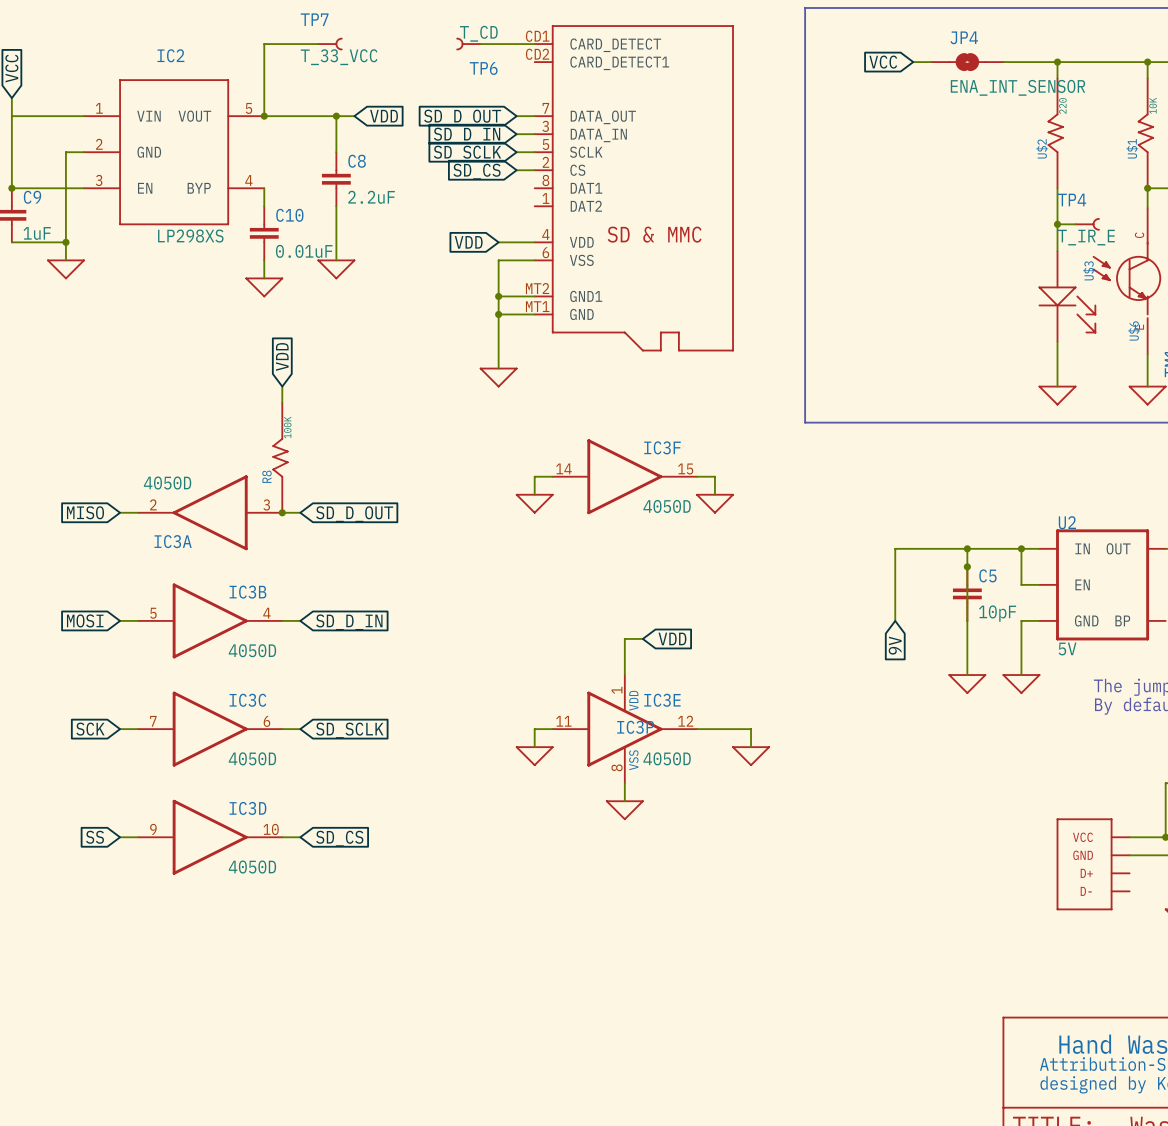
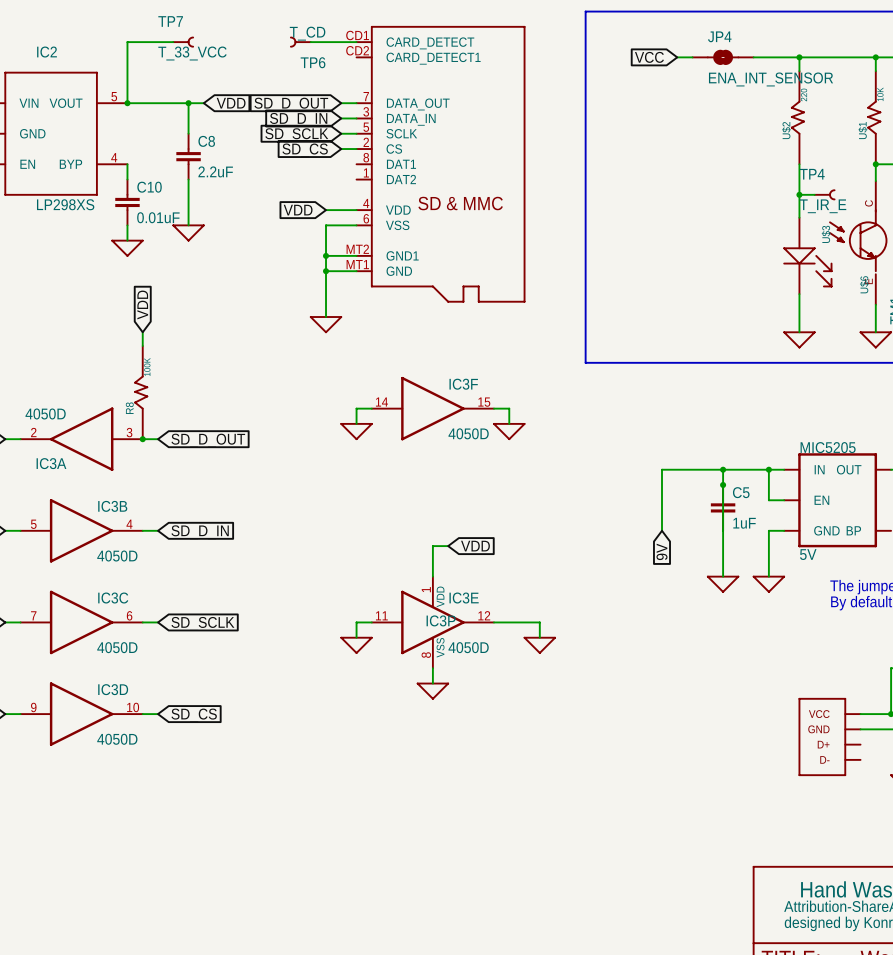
U2 name: U2 (1067, 522) -> MIC5205 (828, 447)
C5 value: 10pF (997, 613) -> 1uF (744, 523)

